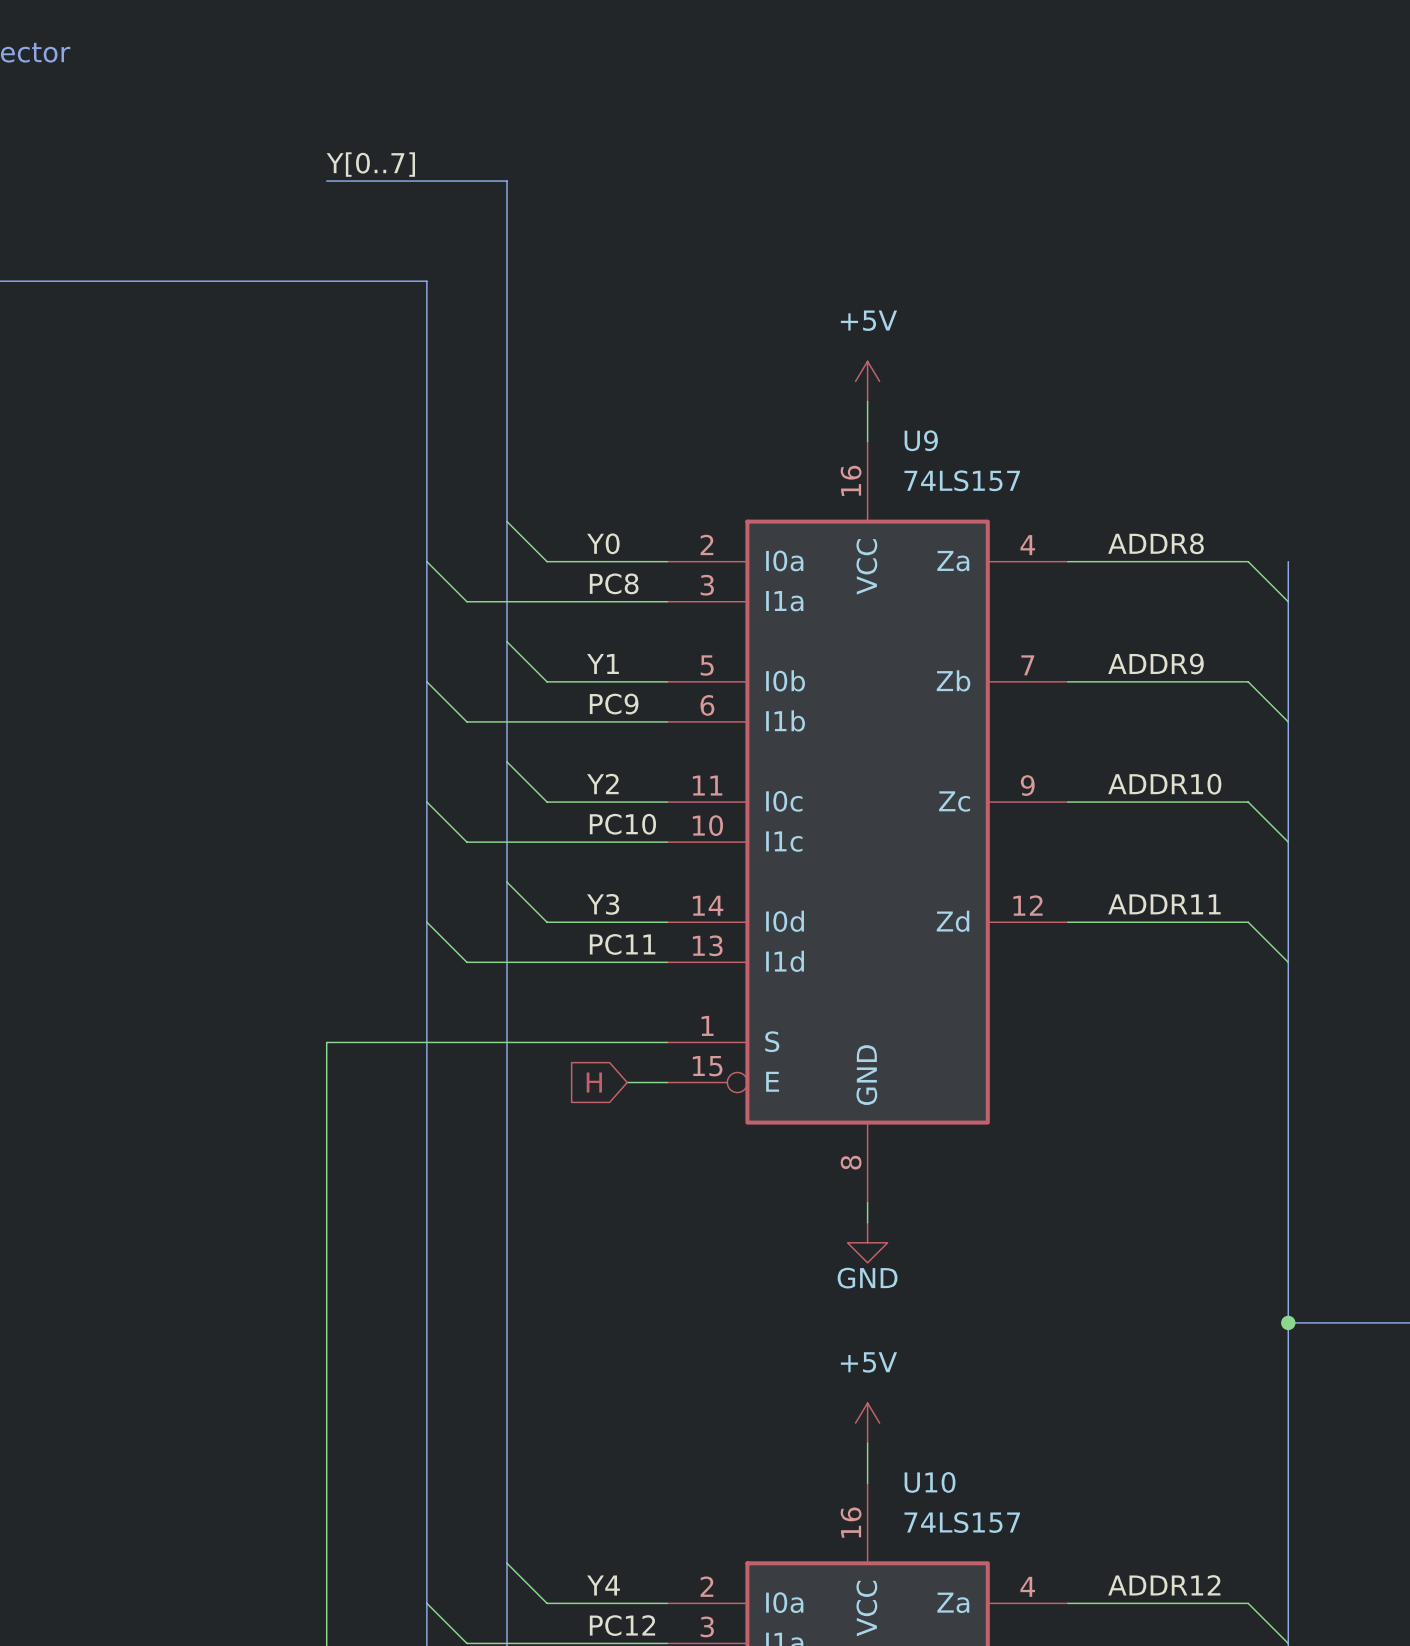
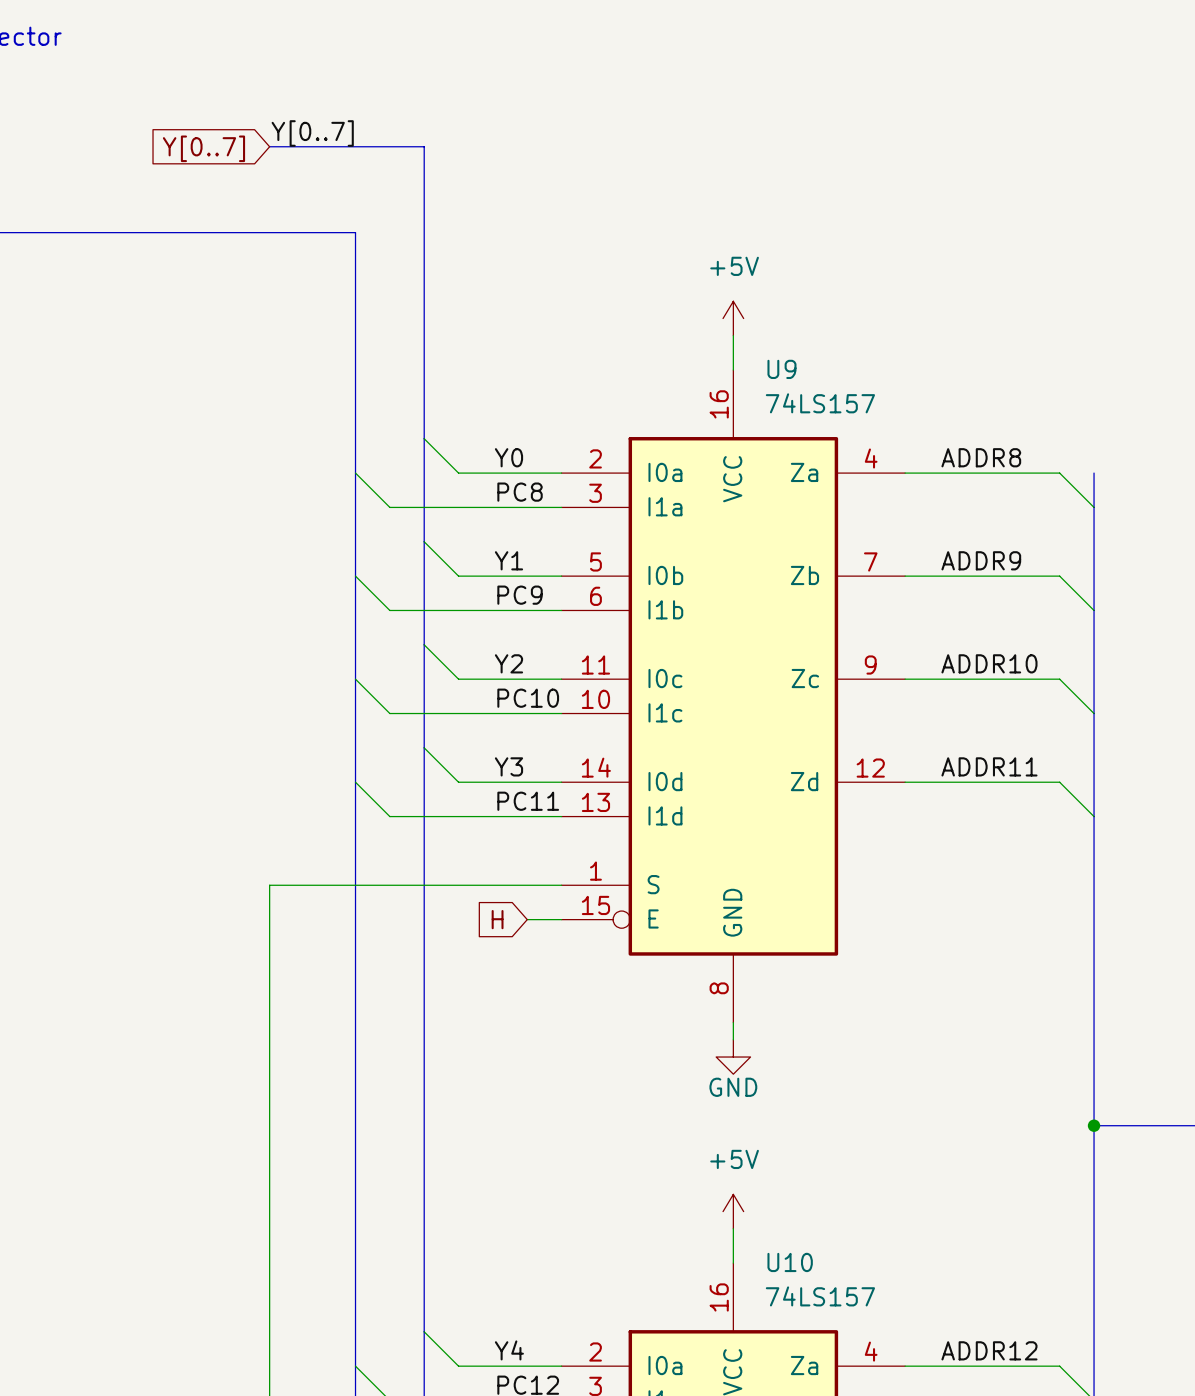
global label: none -> Y[0..7] (203, 148)

